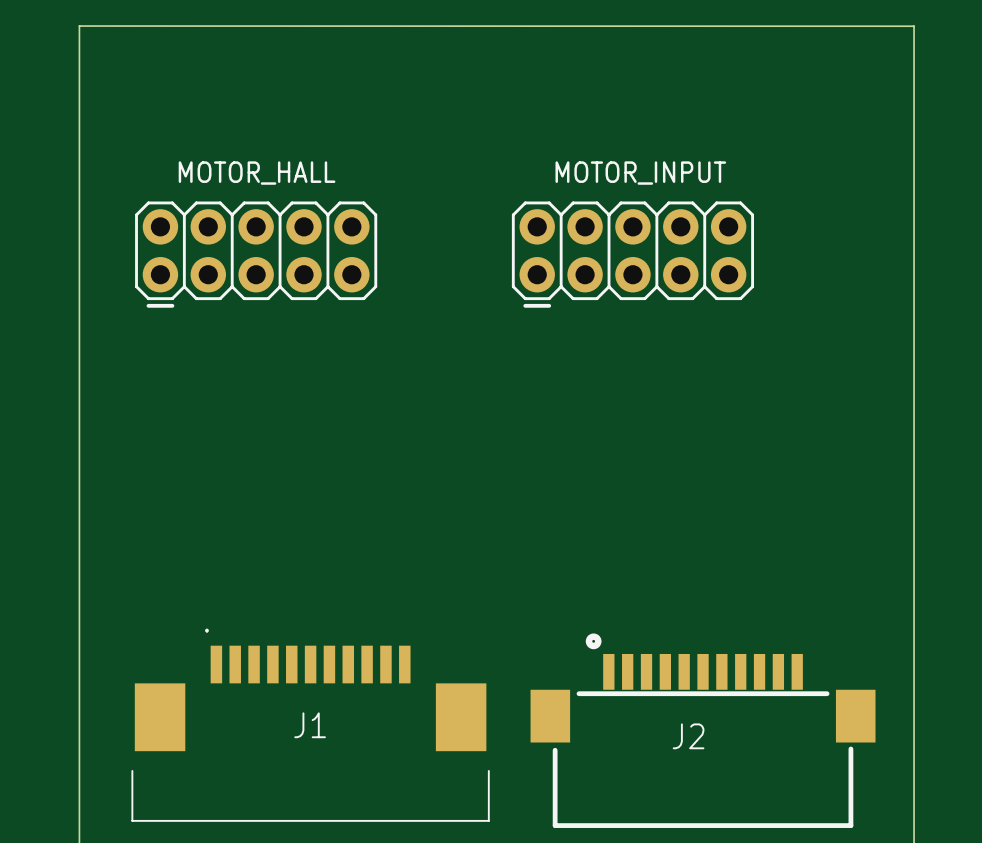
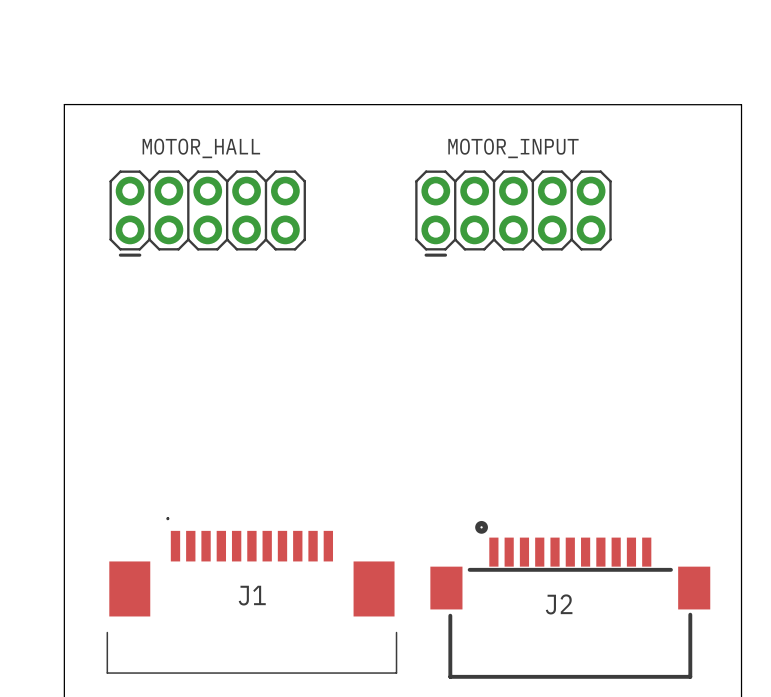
board edge: (79, 120) (79, 26) (914, 26) (914, 120) -> (64, 104) (741, 104)

